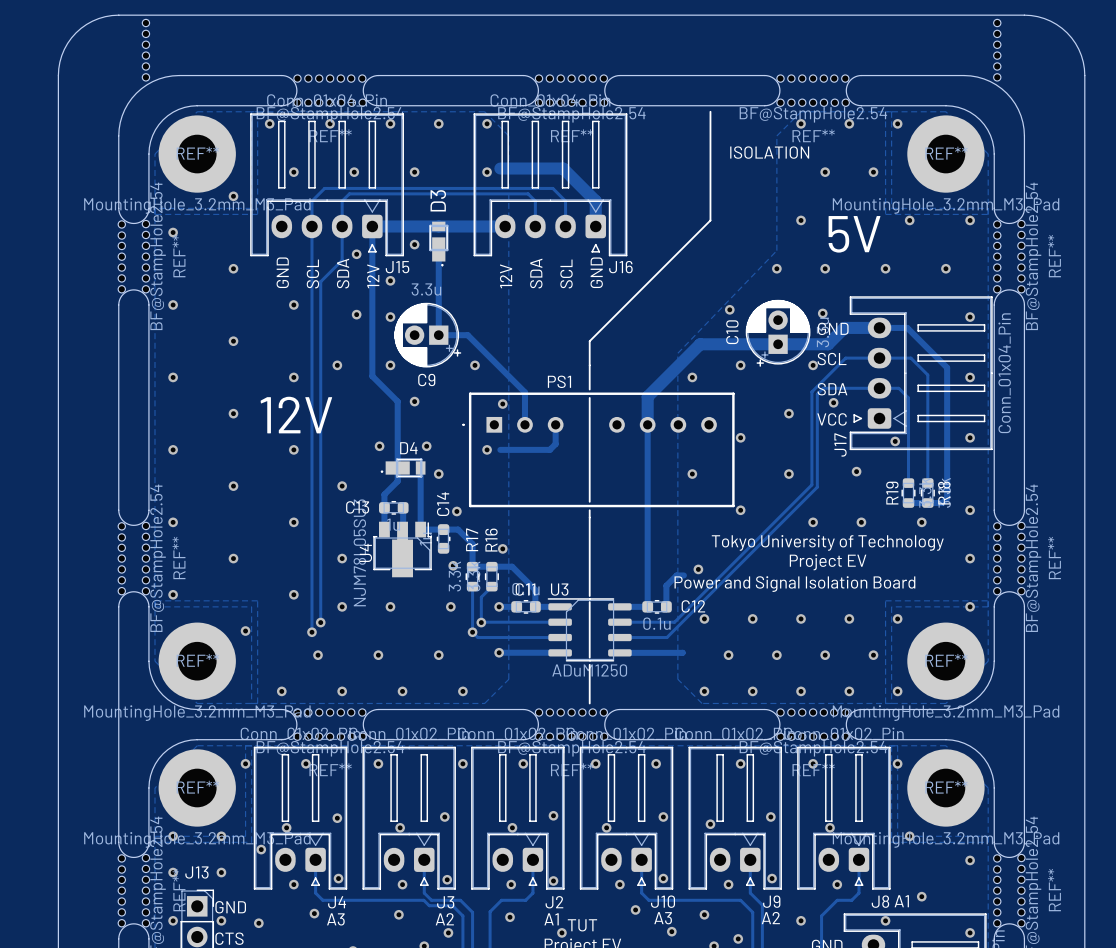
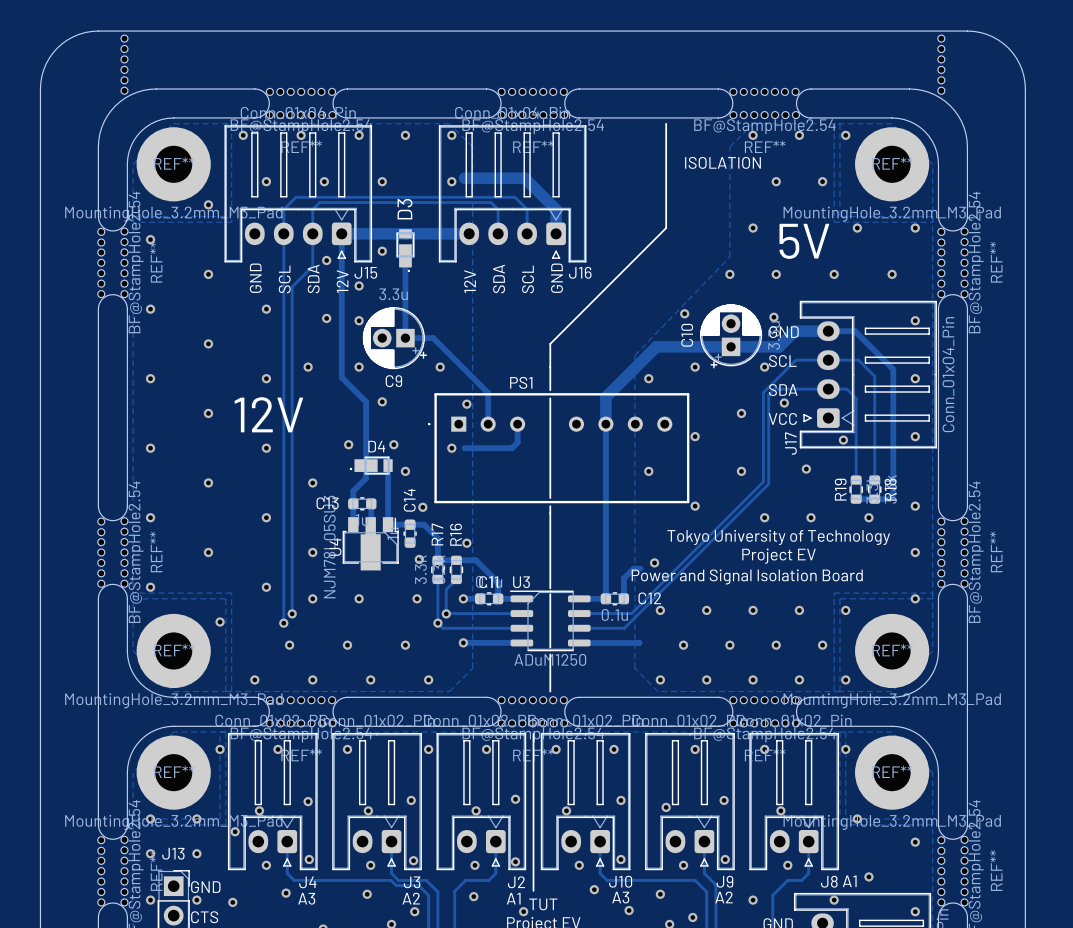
line: none -> (533, 733) (533, 890)

